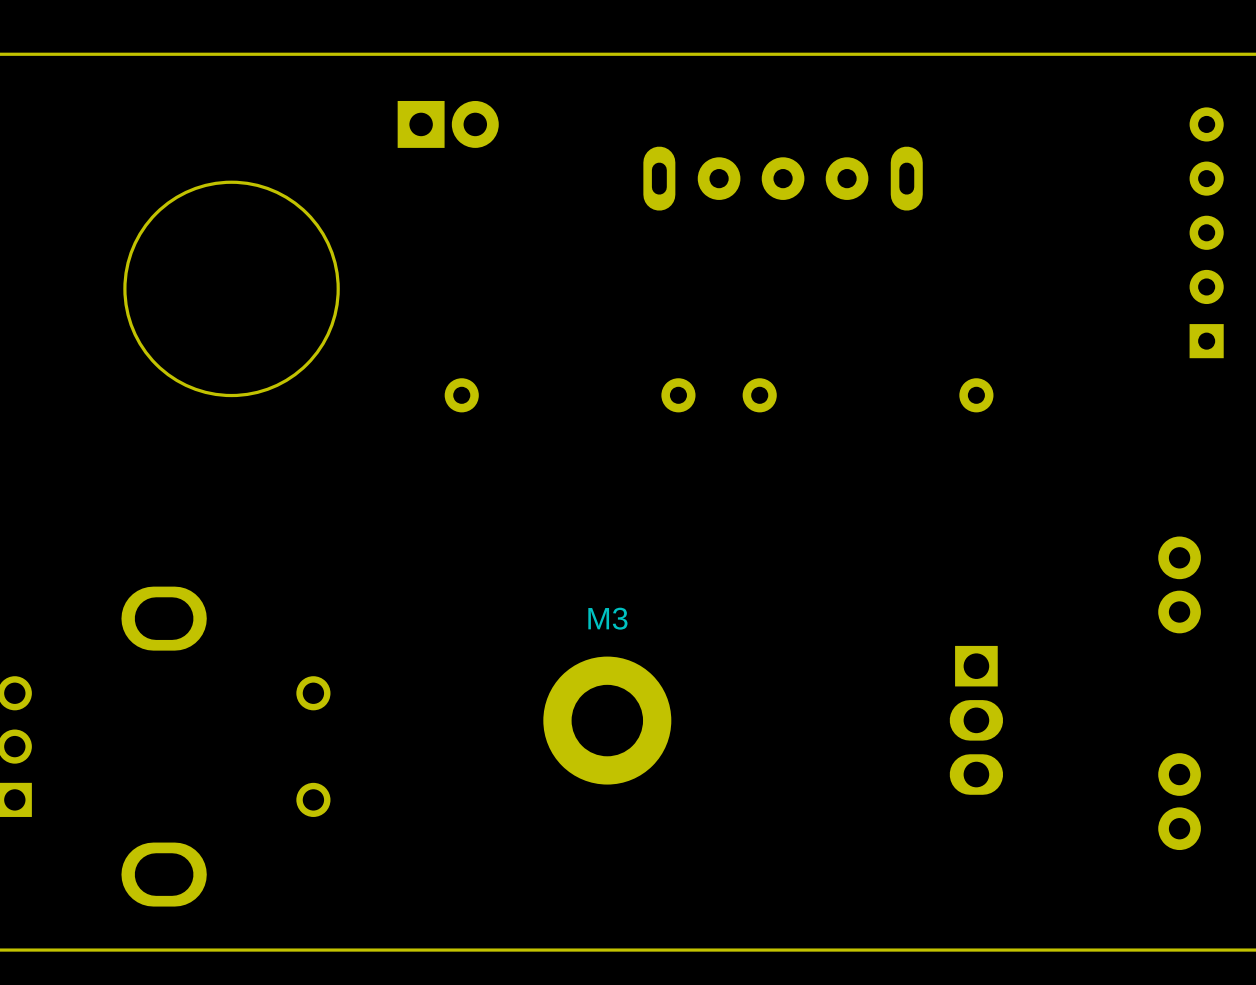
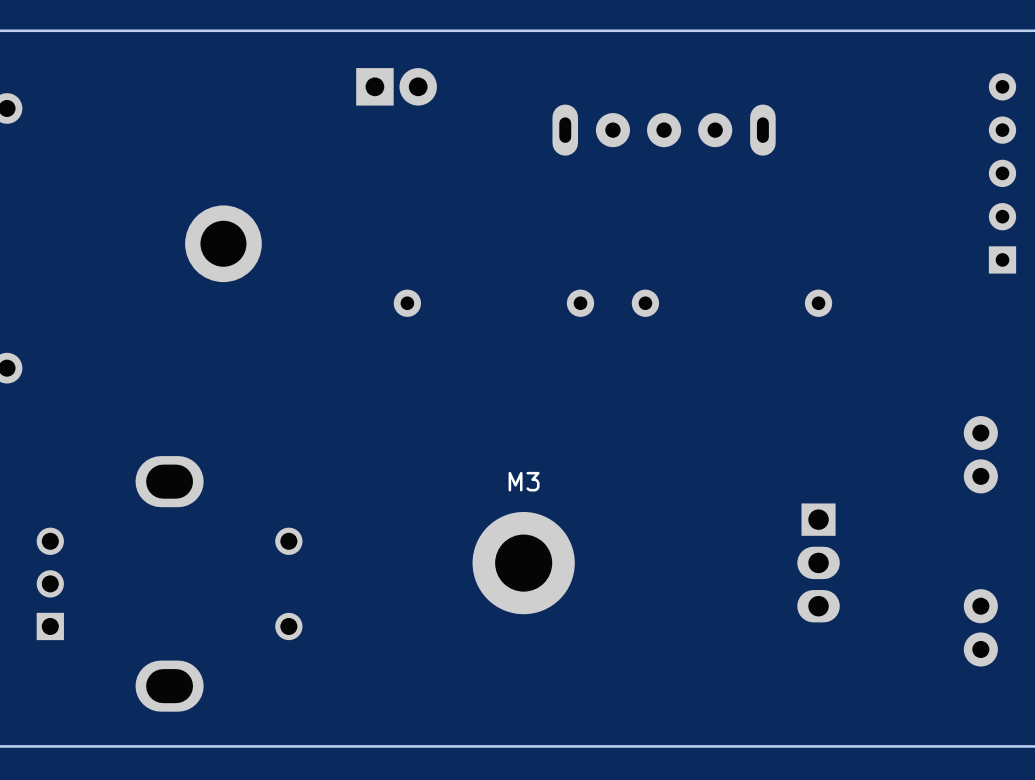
round board edge: [123, 180, 340, 398] -> none
part: none -> (223, 243)

